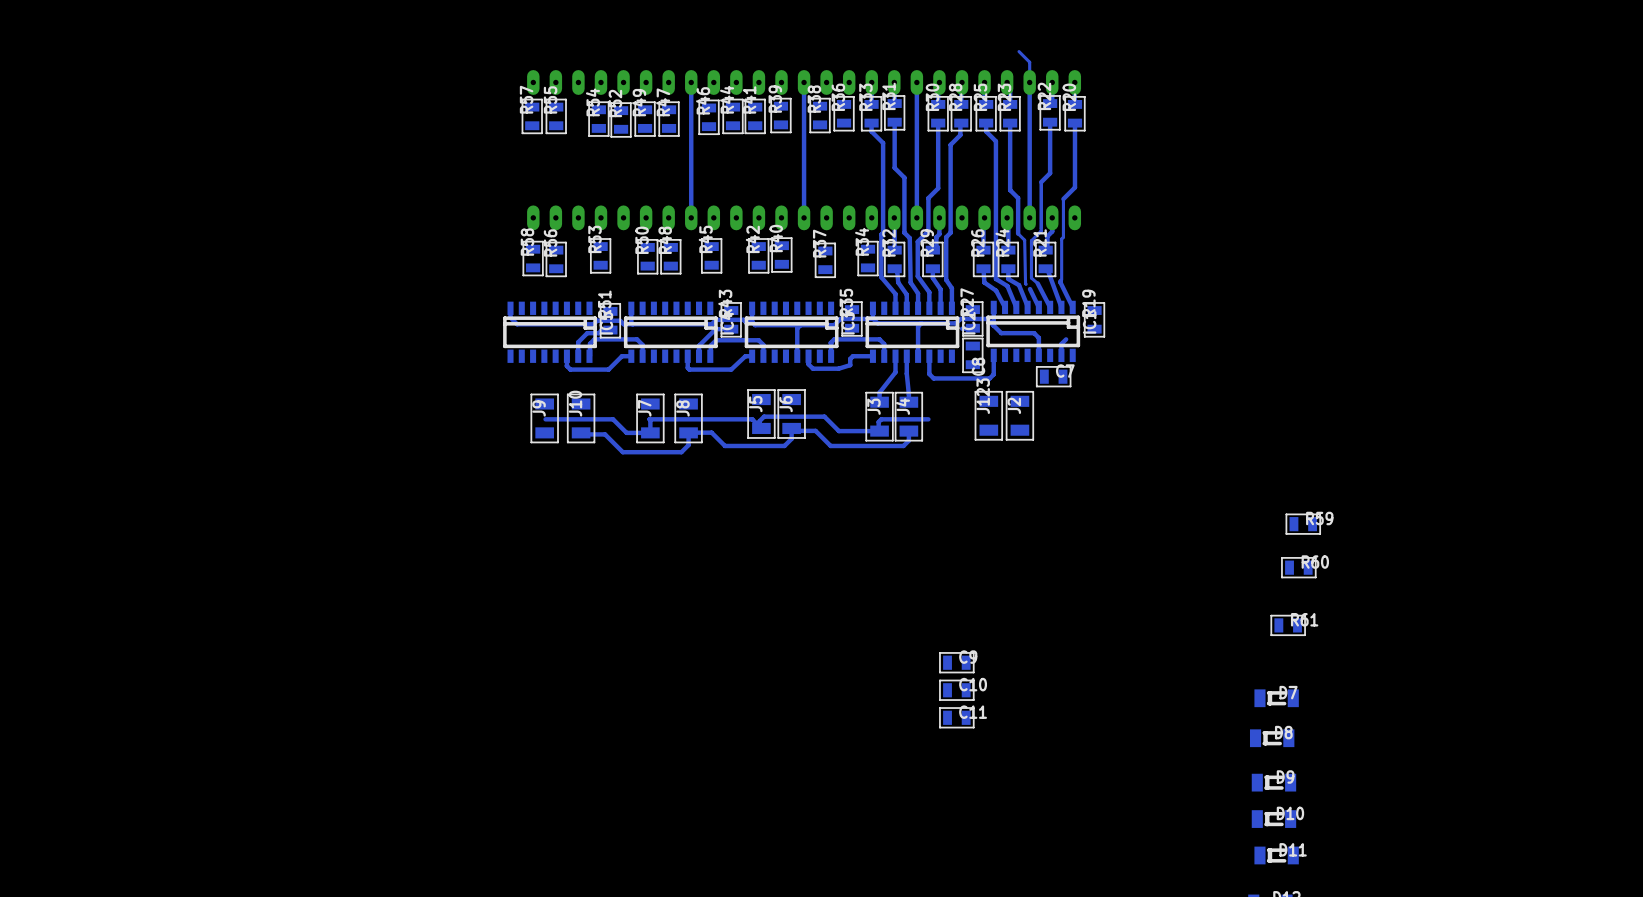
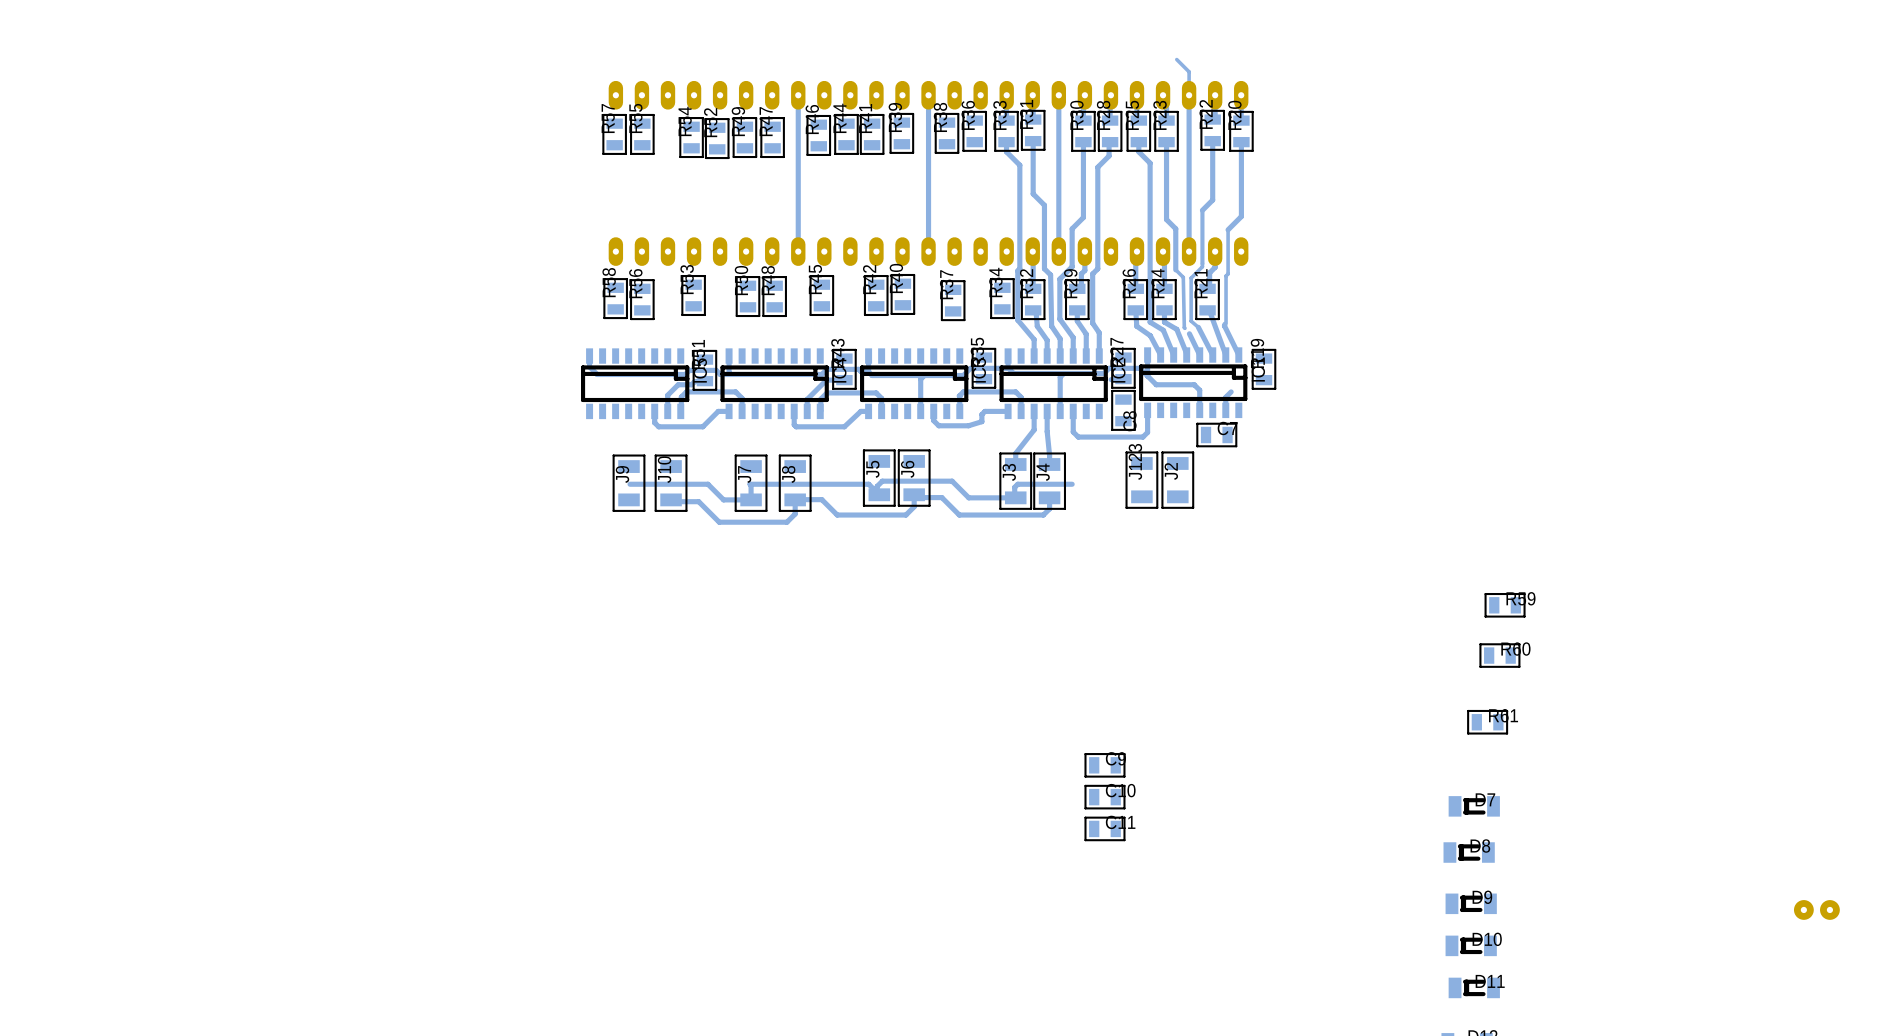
part: none -> (1816, 909)

